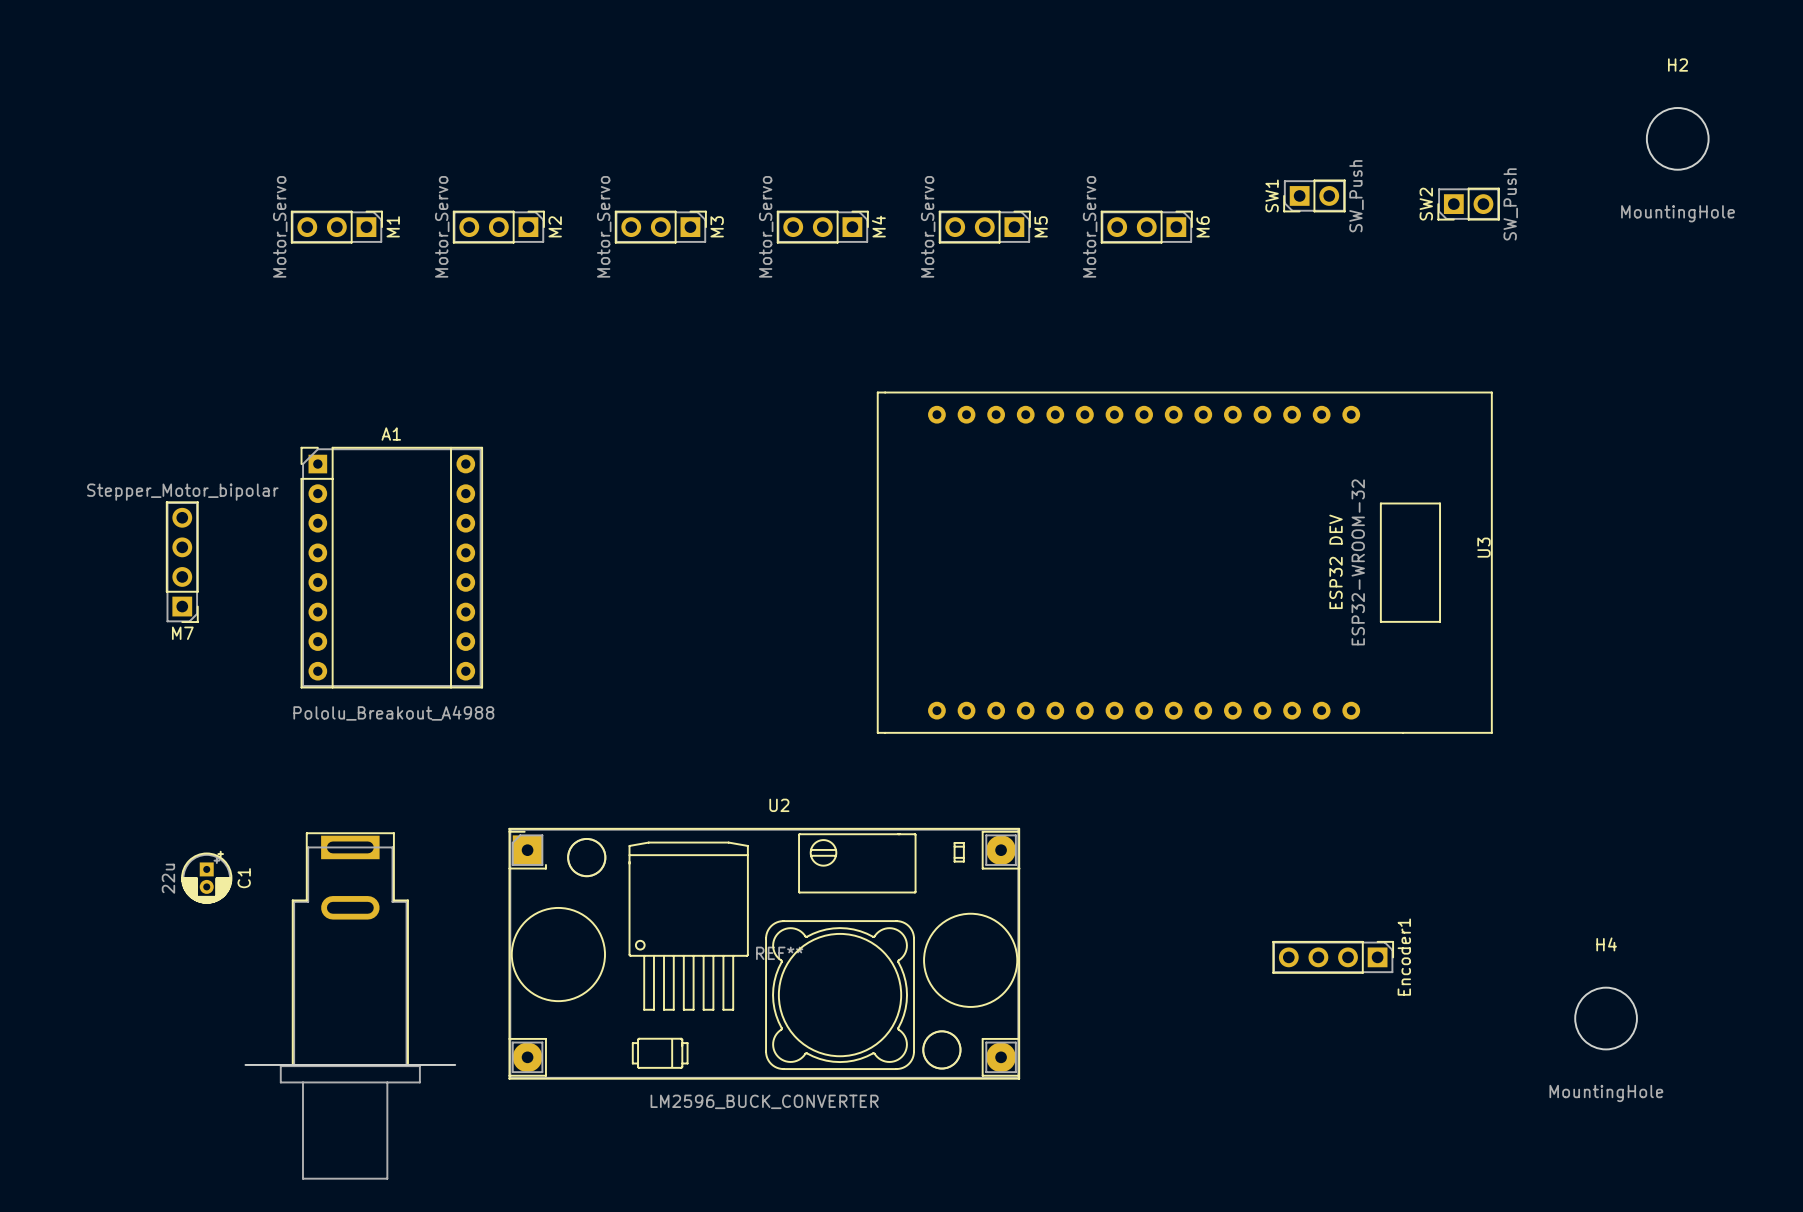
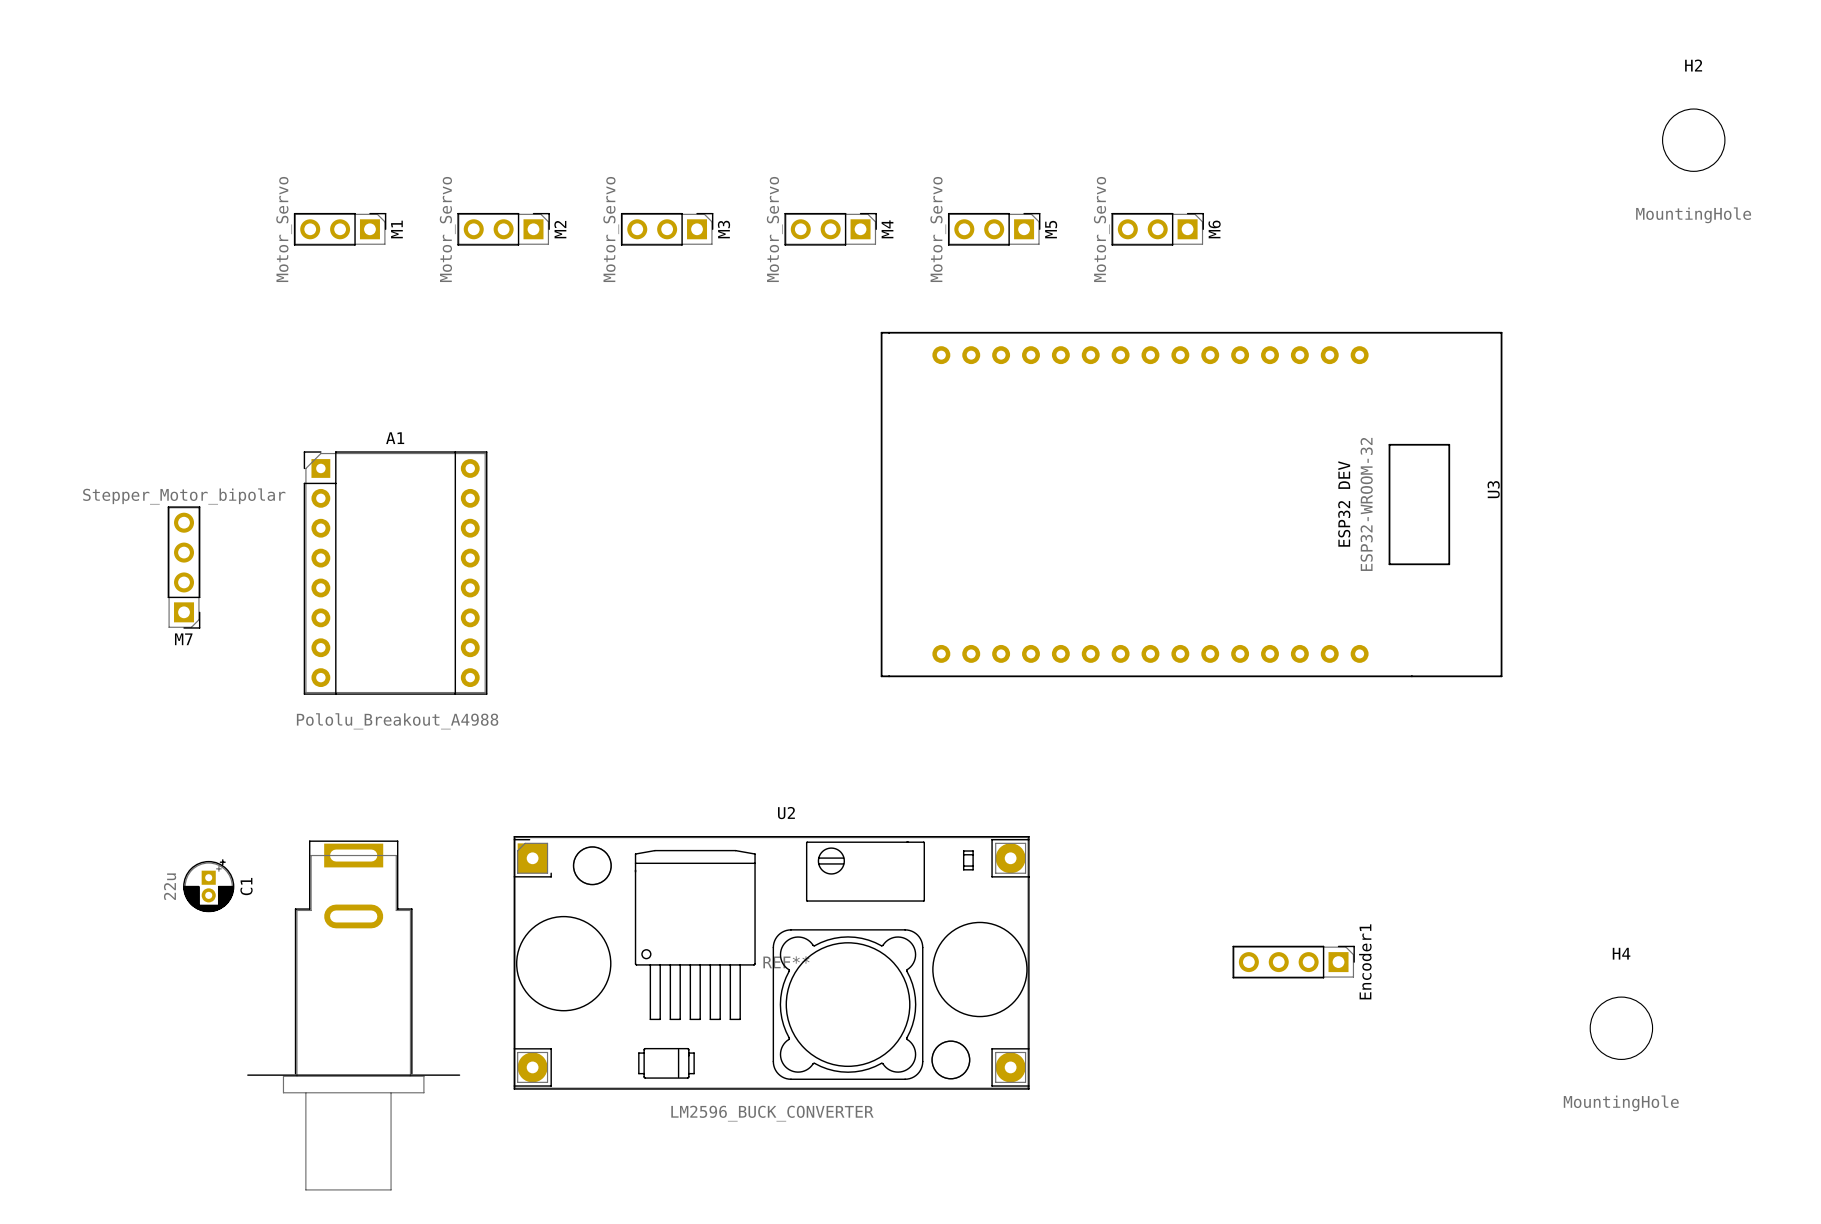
SW1: SW_Push (1314, 195) -> none
SW2: SW_Push (1468, 204) -> none
U3 position: (1184, 562) -> (1191, 504)
Encoder1 position: (1333, 957) -> (1293, 962)

